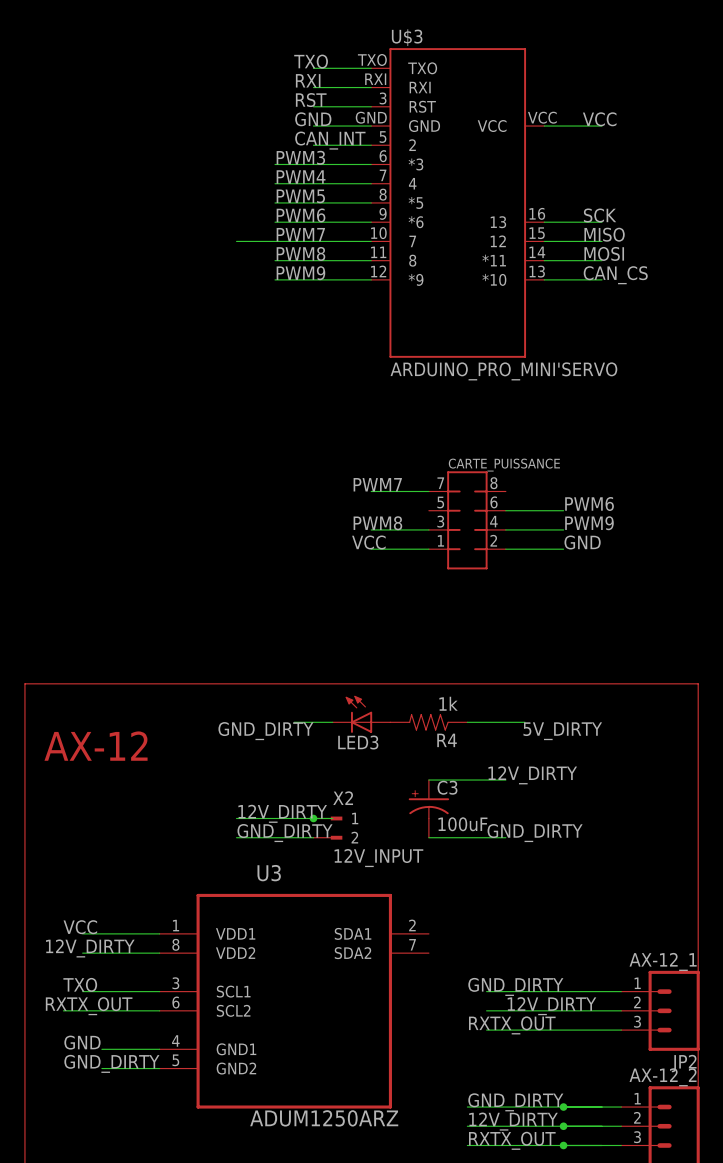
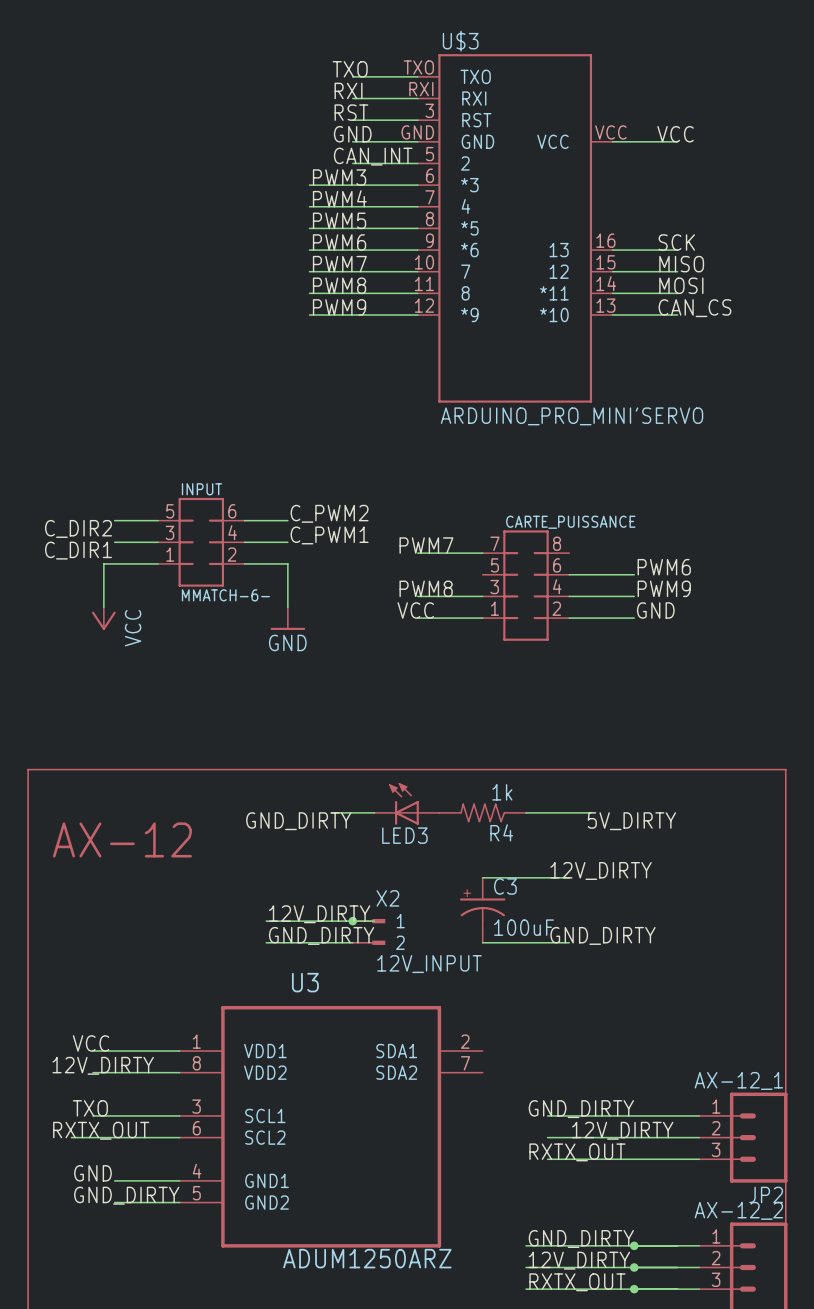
wire: (236, 241) (275, 241) -> none
label: none -> C_PWM2 (329, 513)
wire: none -> (114, 520) (157, 520)
wire: none -> (244, 520) (287, 520)
label: none -> C_DIR2 (78, 528)
label: none -> C_PWM1 (329, 535)
wire: none -> (114, 542) (157, 542)
INPUT: none -> MMATCH-6- (201, 542)
wire: none -> (244, 542) (287, 542)
label: none -> C_DIR1 (78, 550)
wire: none -> (157, 563) (103, 563) (103, 607)
wire: none -> (244, 563) (287, 563) (287, 607)
power symbol: none -> VCC (103, 618)
power symbol: none -> GND (287, 618)

